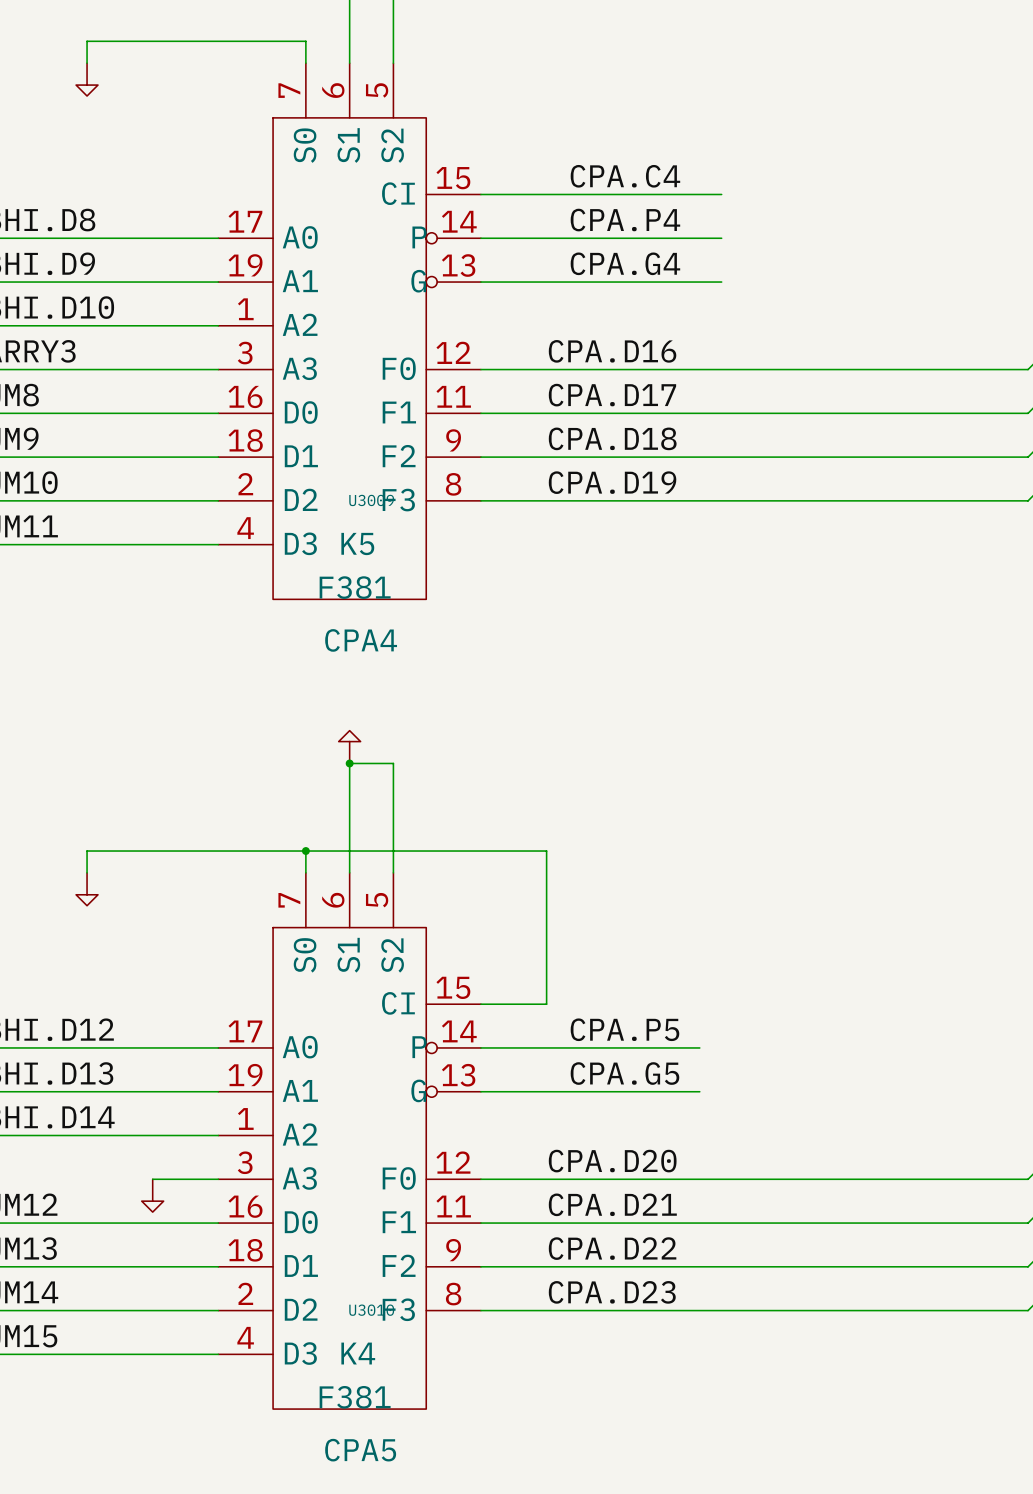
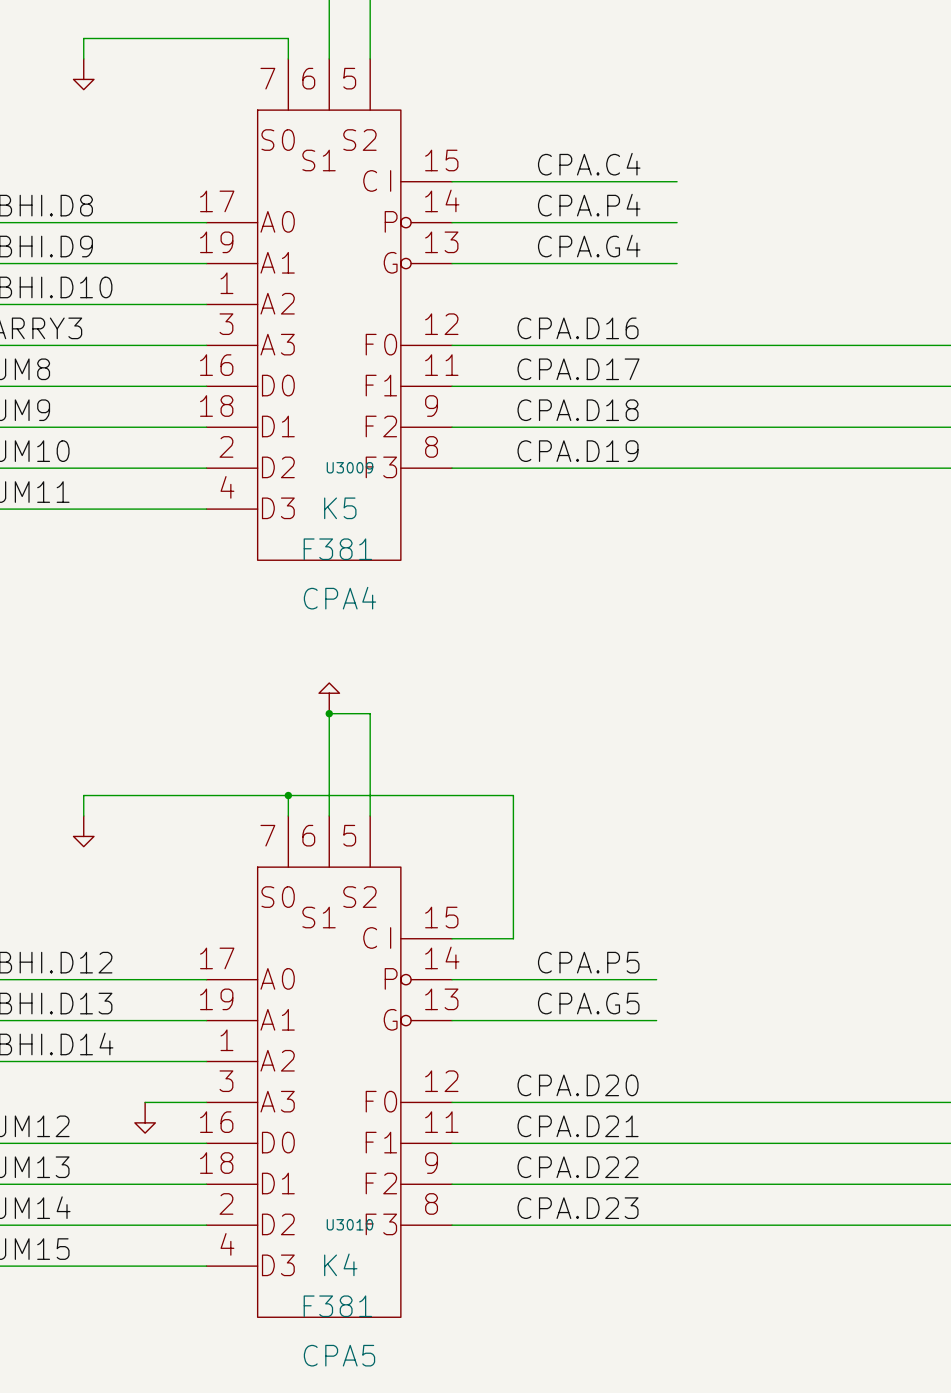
U3009 symbol: [218, 63, 481, 600] -> [206, 58, 453, 561]
U3010 symbol: [218, 872, 481, 1410] -> [206, 815, 453, 1318]

